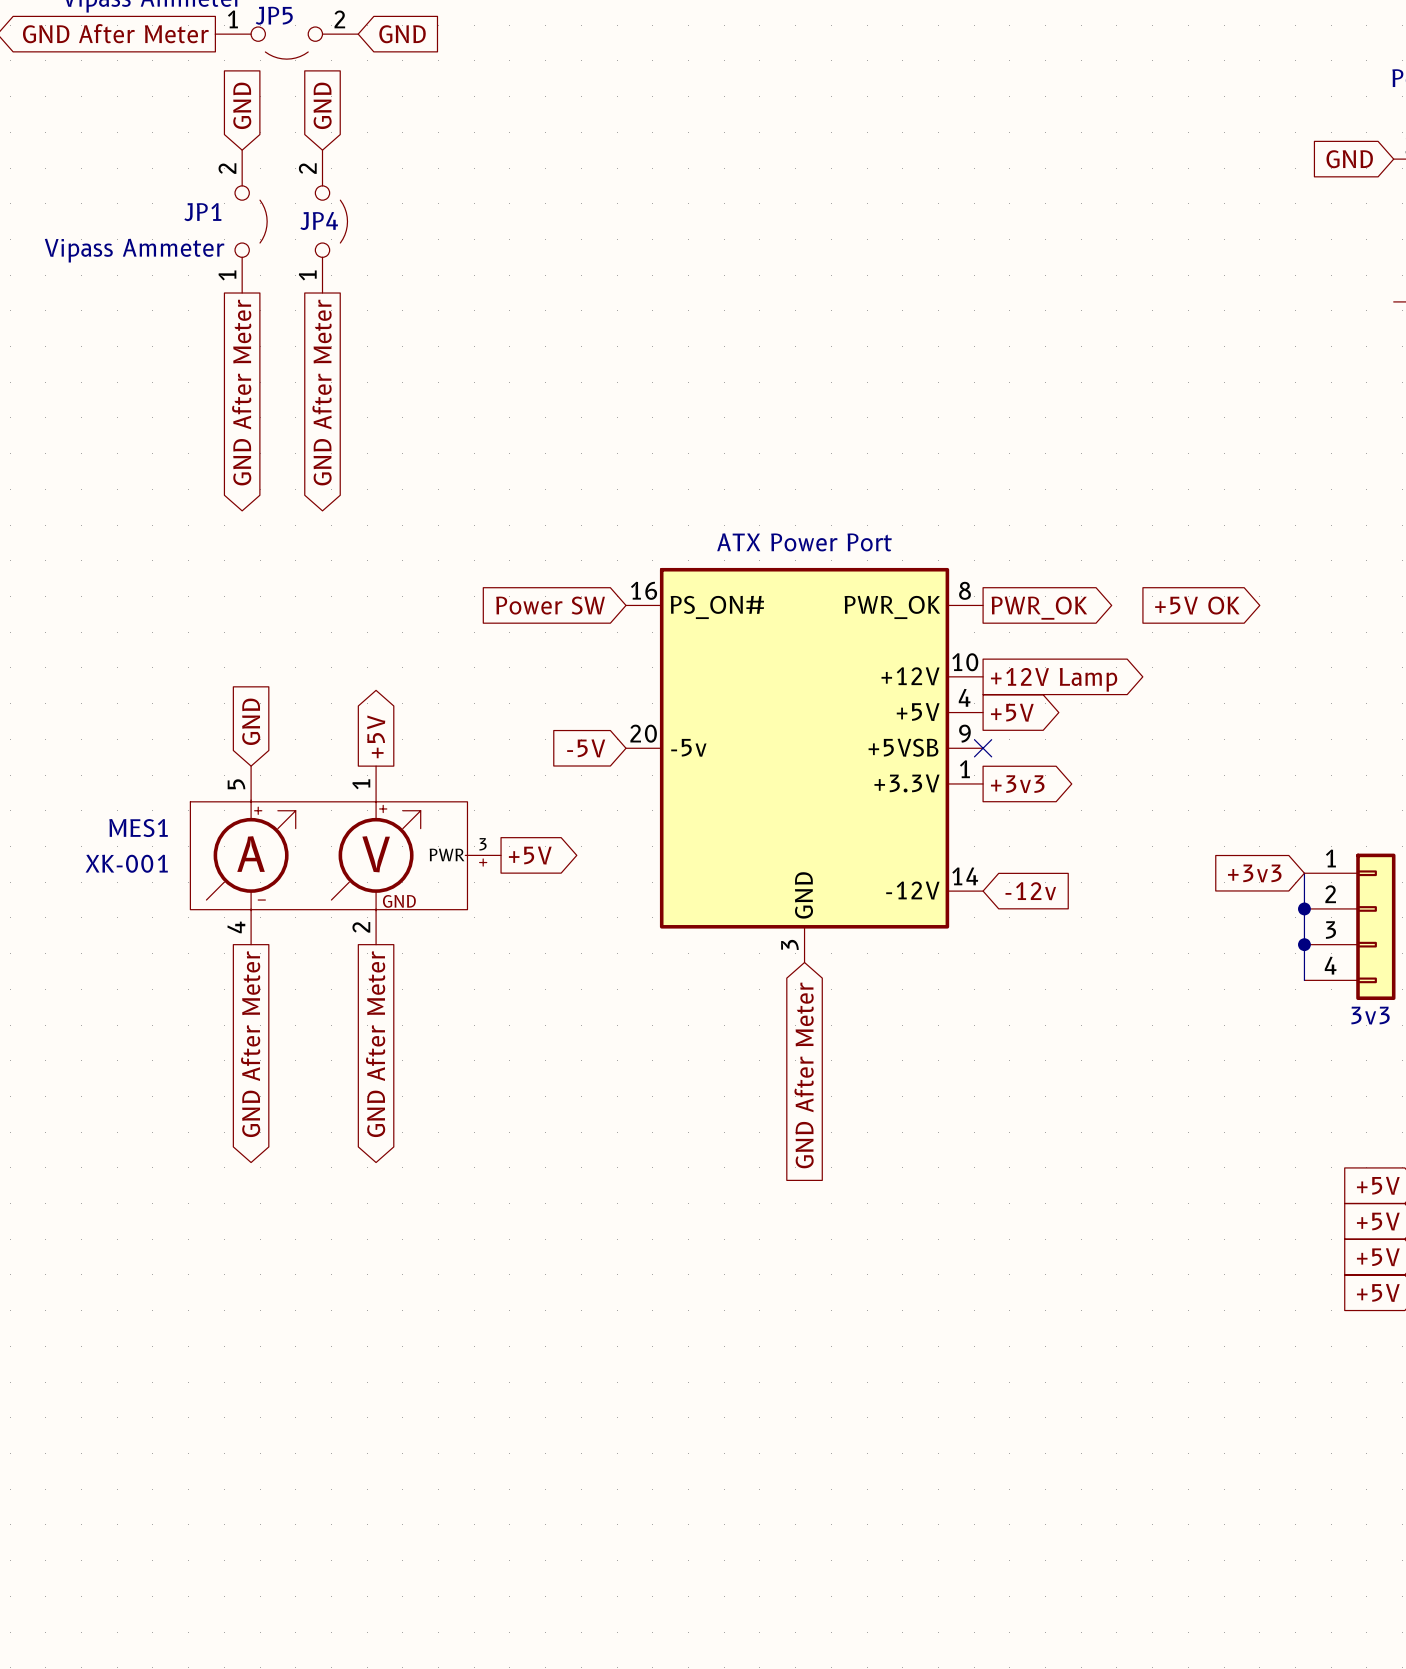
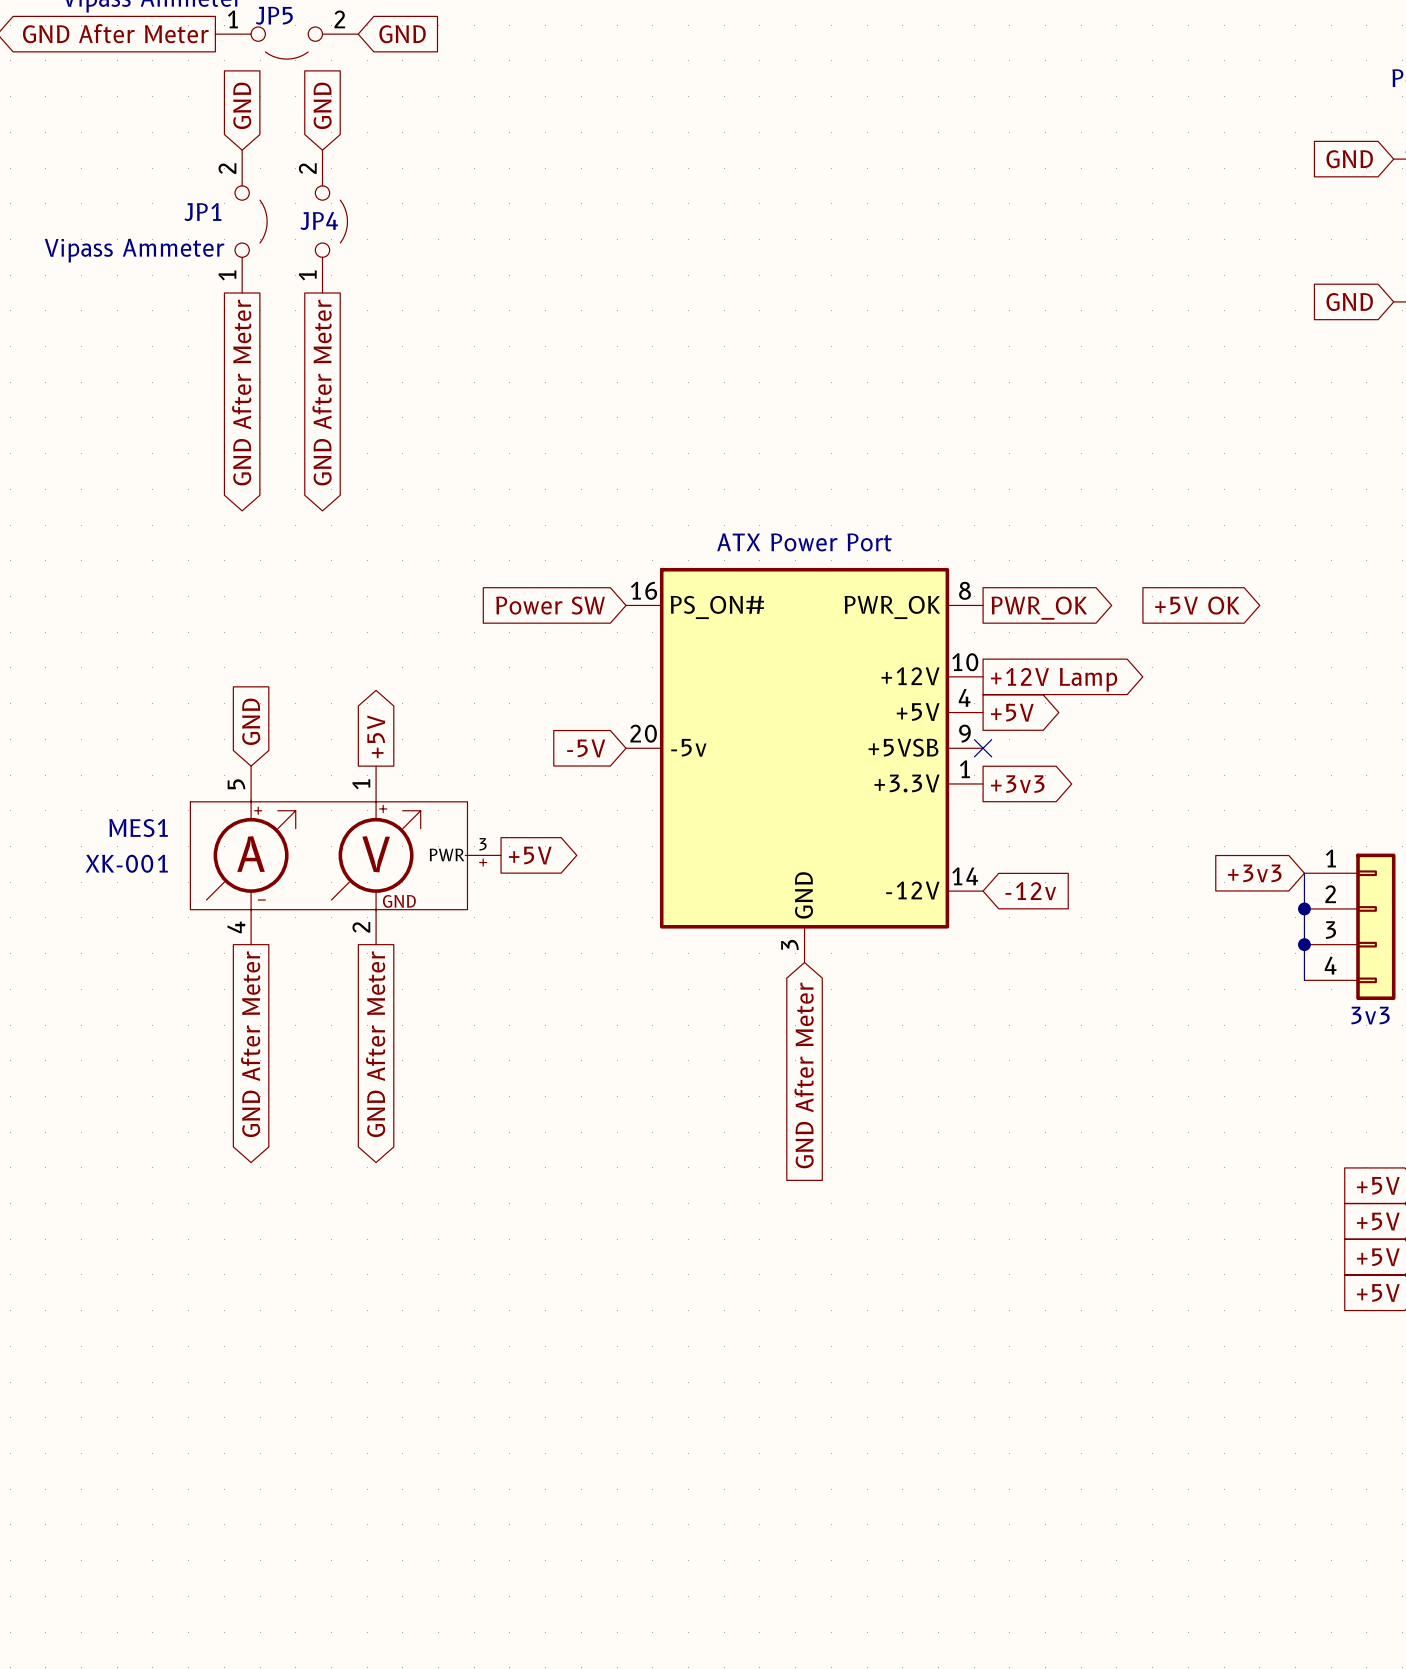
global label: none -> GND (1349, 302)

